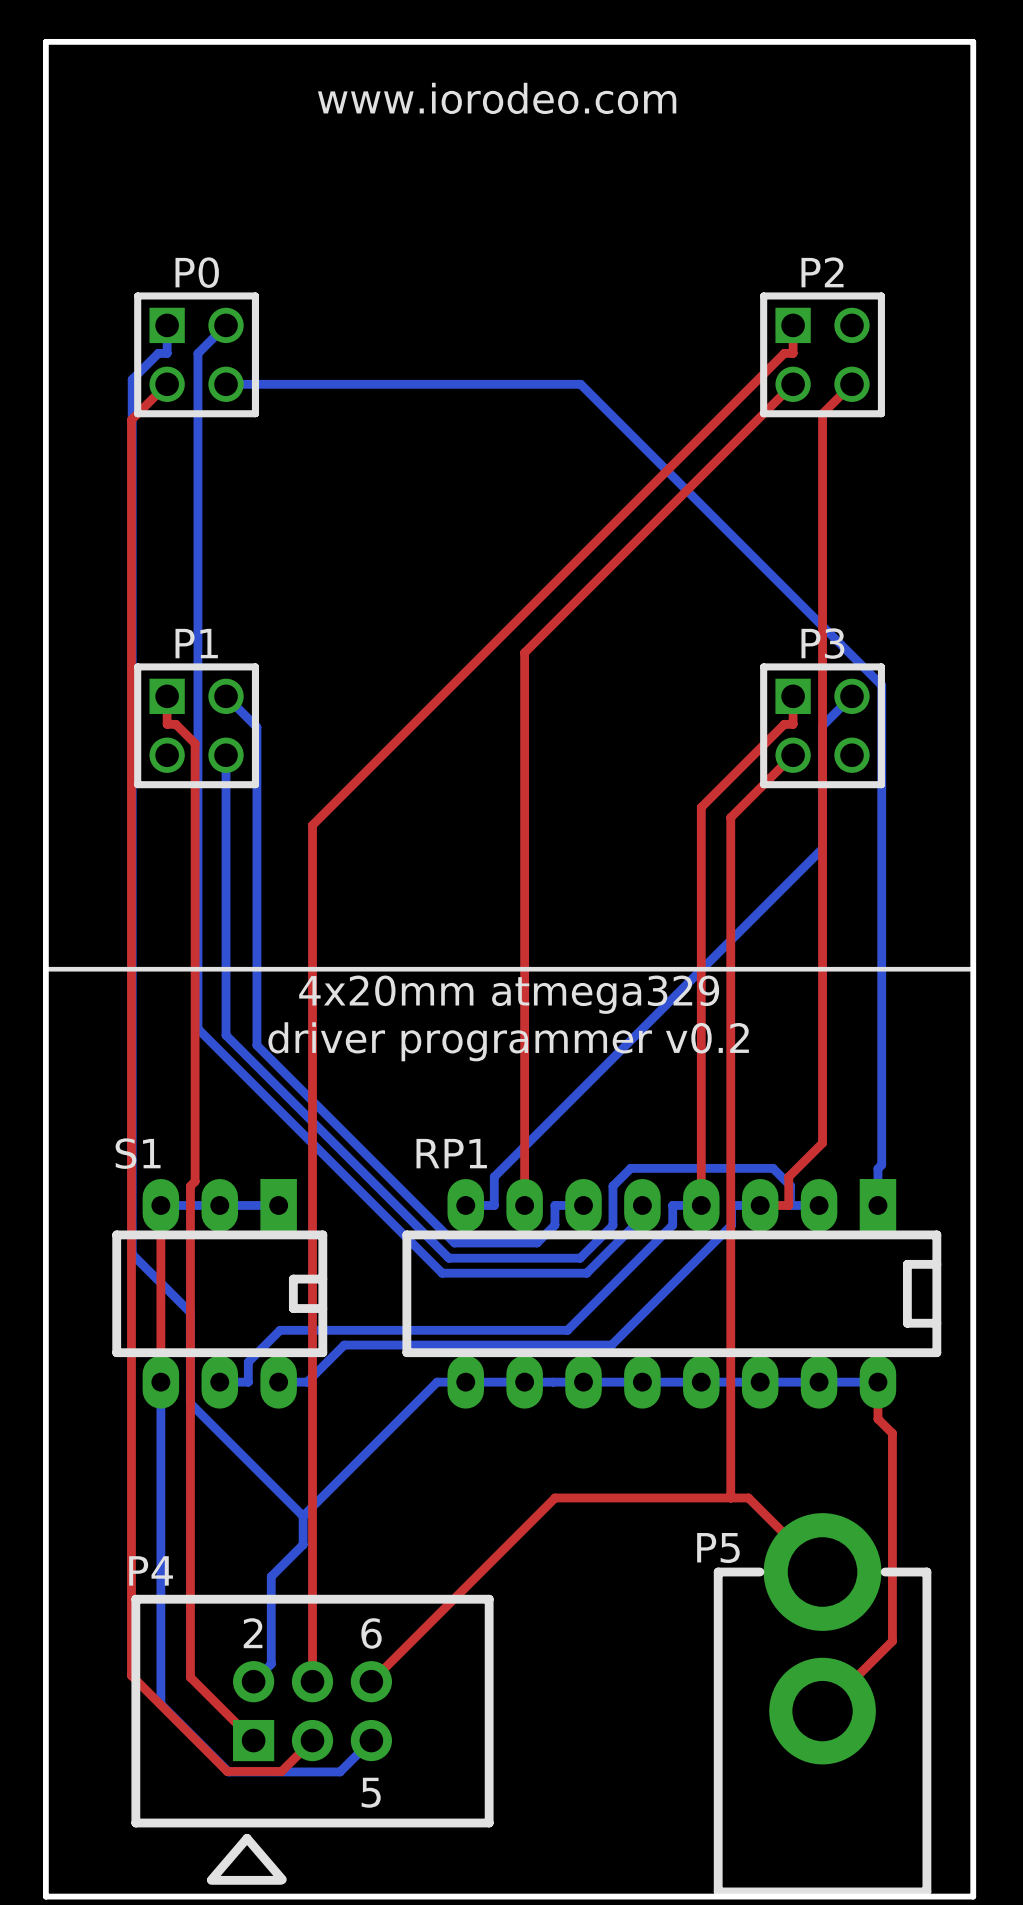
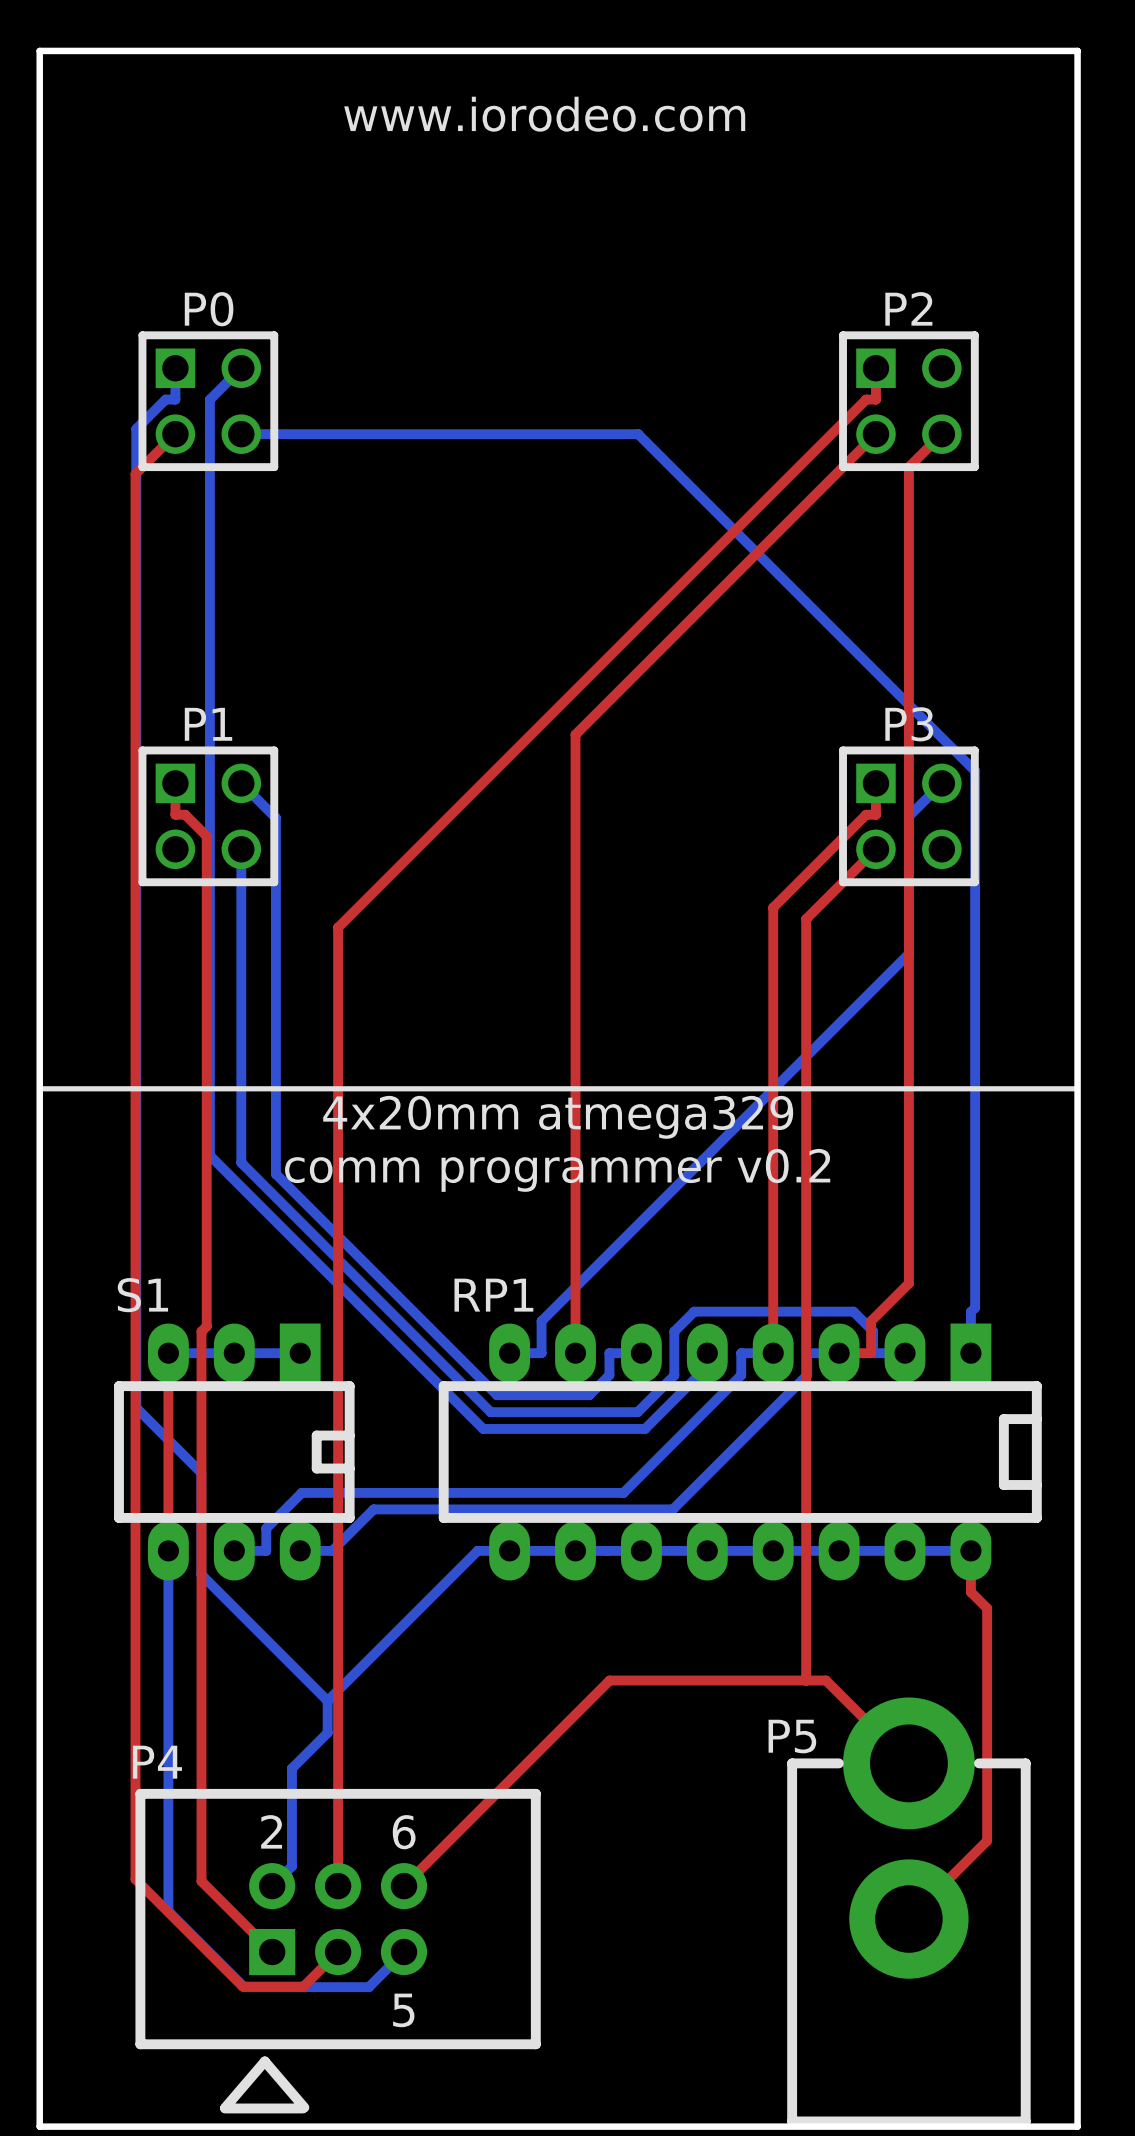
text: driver programmer v0.2 (508, 1041) -> comm programmer v0.2 (557, 1170)

